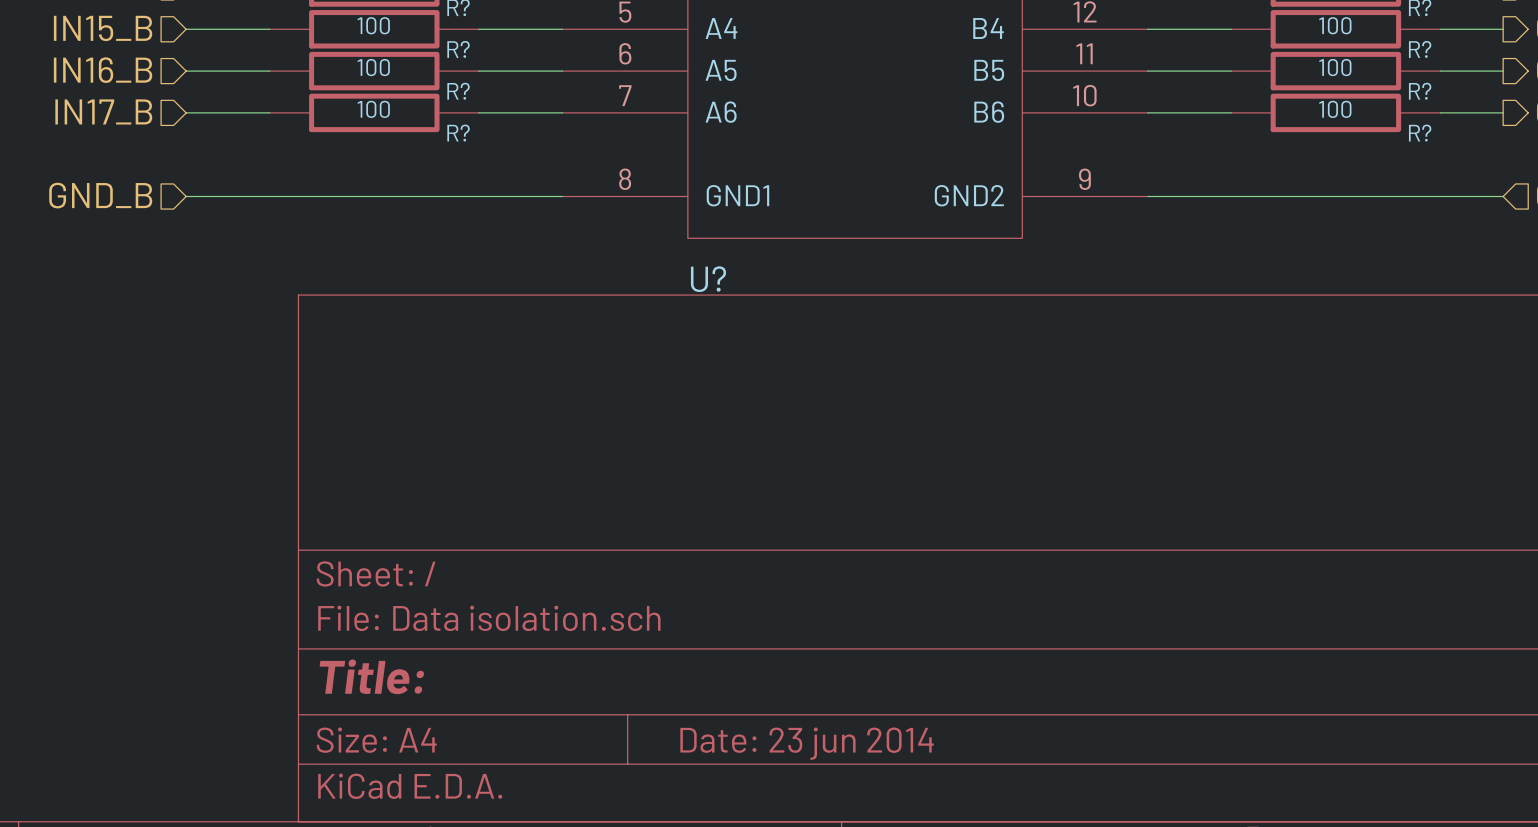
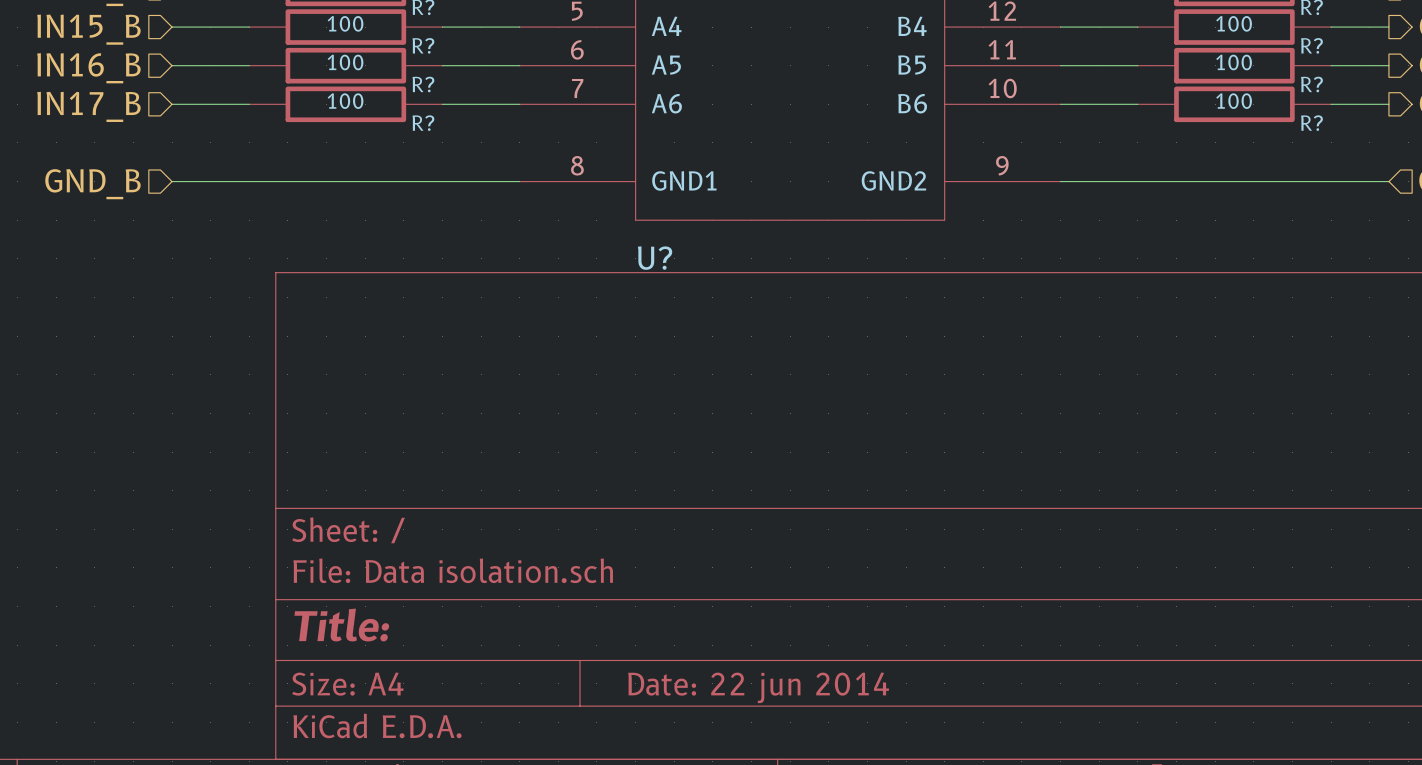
title block: Date: 23 jun 2014 (807, 743) -> Date: 22 jun 2014 (758, 687)

